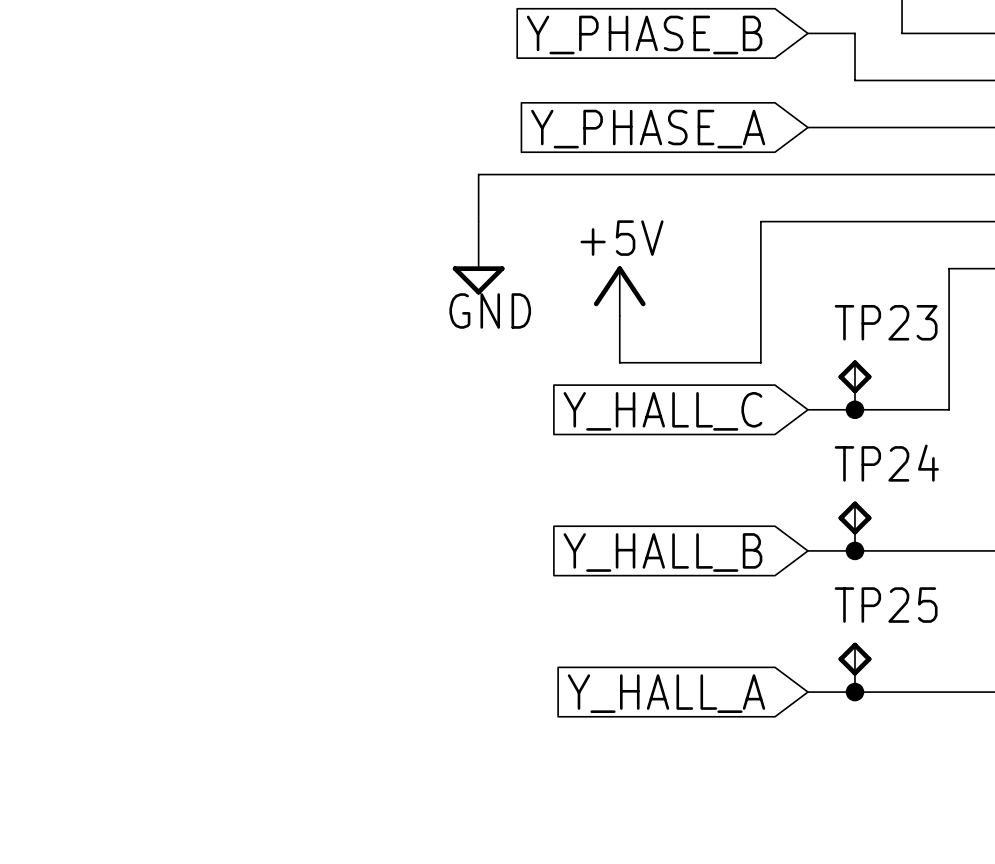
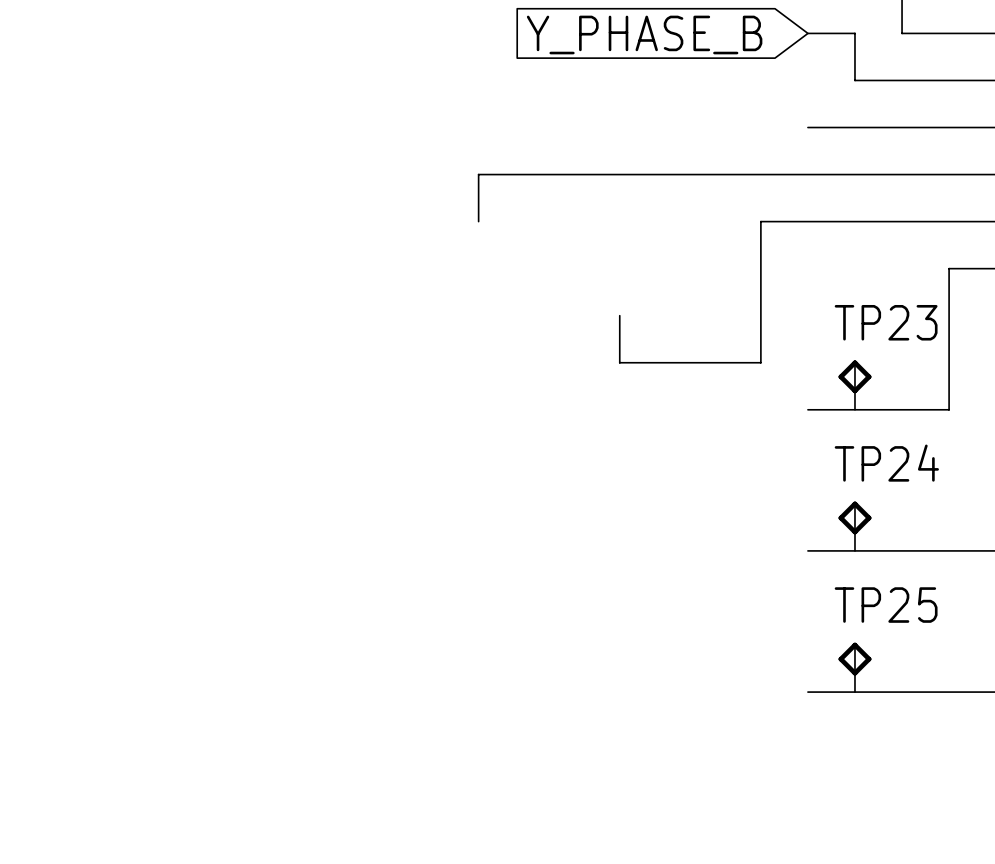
global label: Y_PHASE_A (648, 129) -> none
power symbol: GND (478, 258) -> none
power symbol: +5V (619, 291) -> none
junction: (854, 409) -> none
global label: Y_HALL_C (662, 411) -> none
junction: (854, 550) -> none
global label: Y_HALL_B (662, 552) -> none
junction: (854, 692) -> none
global label: Y_HALL_A (666, 693) -> none

